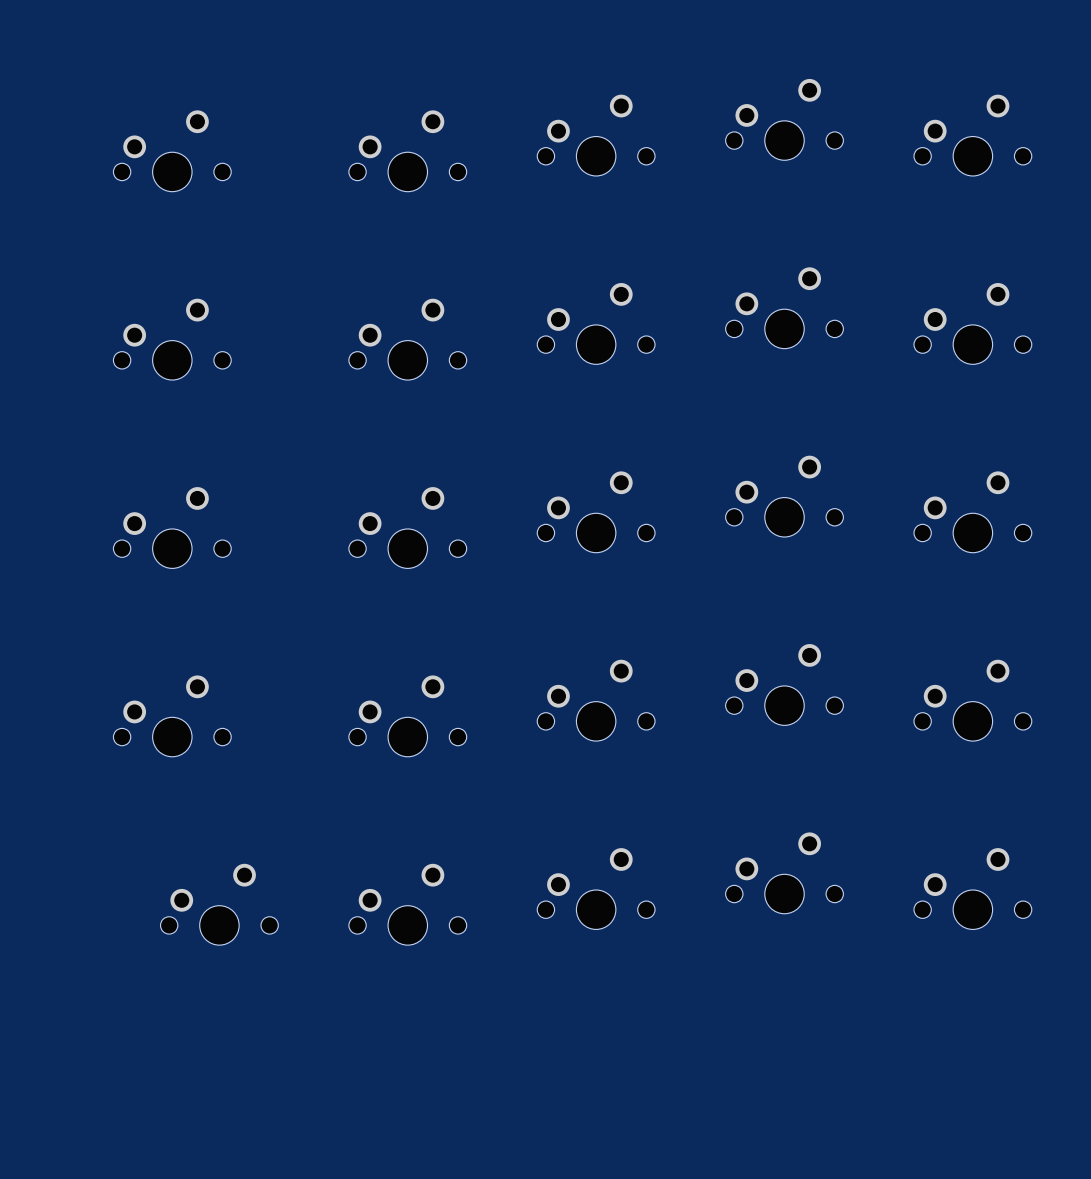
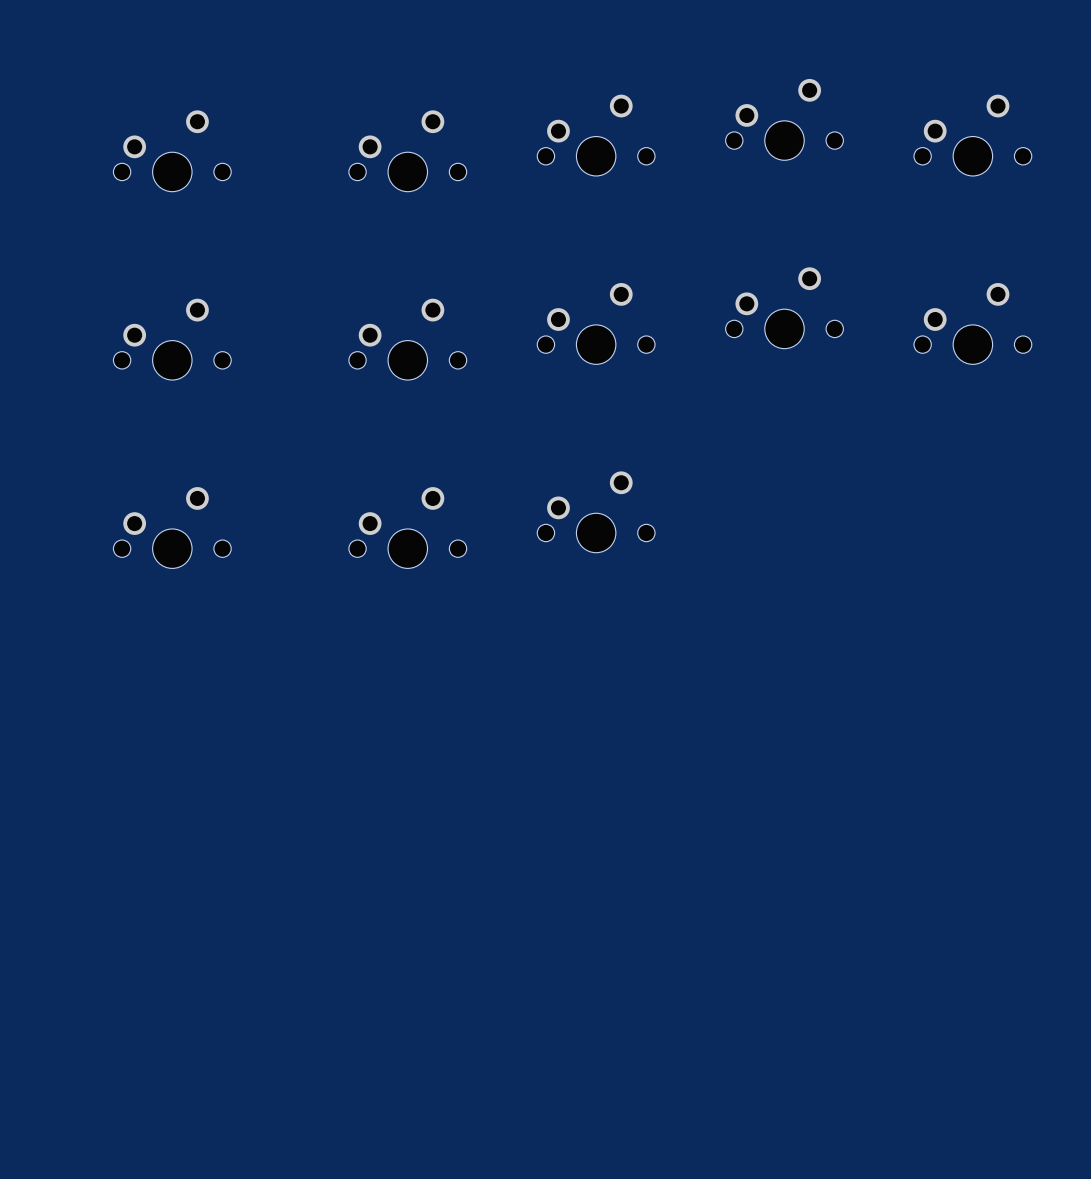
part: (784, 496) -> none
part: (972, 512) -> none
part: (784, 684) -> none
part: (596, 700) -> none
part: (972, 700) -> none
part: (172, 716) -> none
part: (407, 716) -> none
part: (784, 873) -> none
part: (596, 888) -> none
part: (972, 888) -> none
part: (219, 904) -> none
part: (407, 904) -> none

